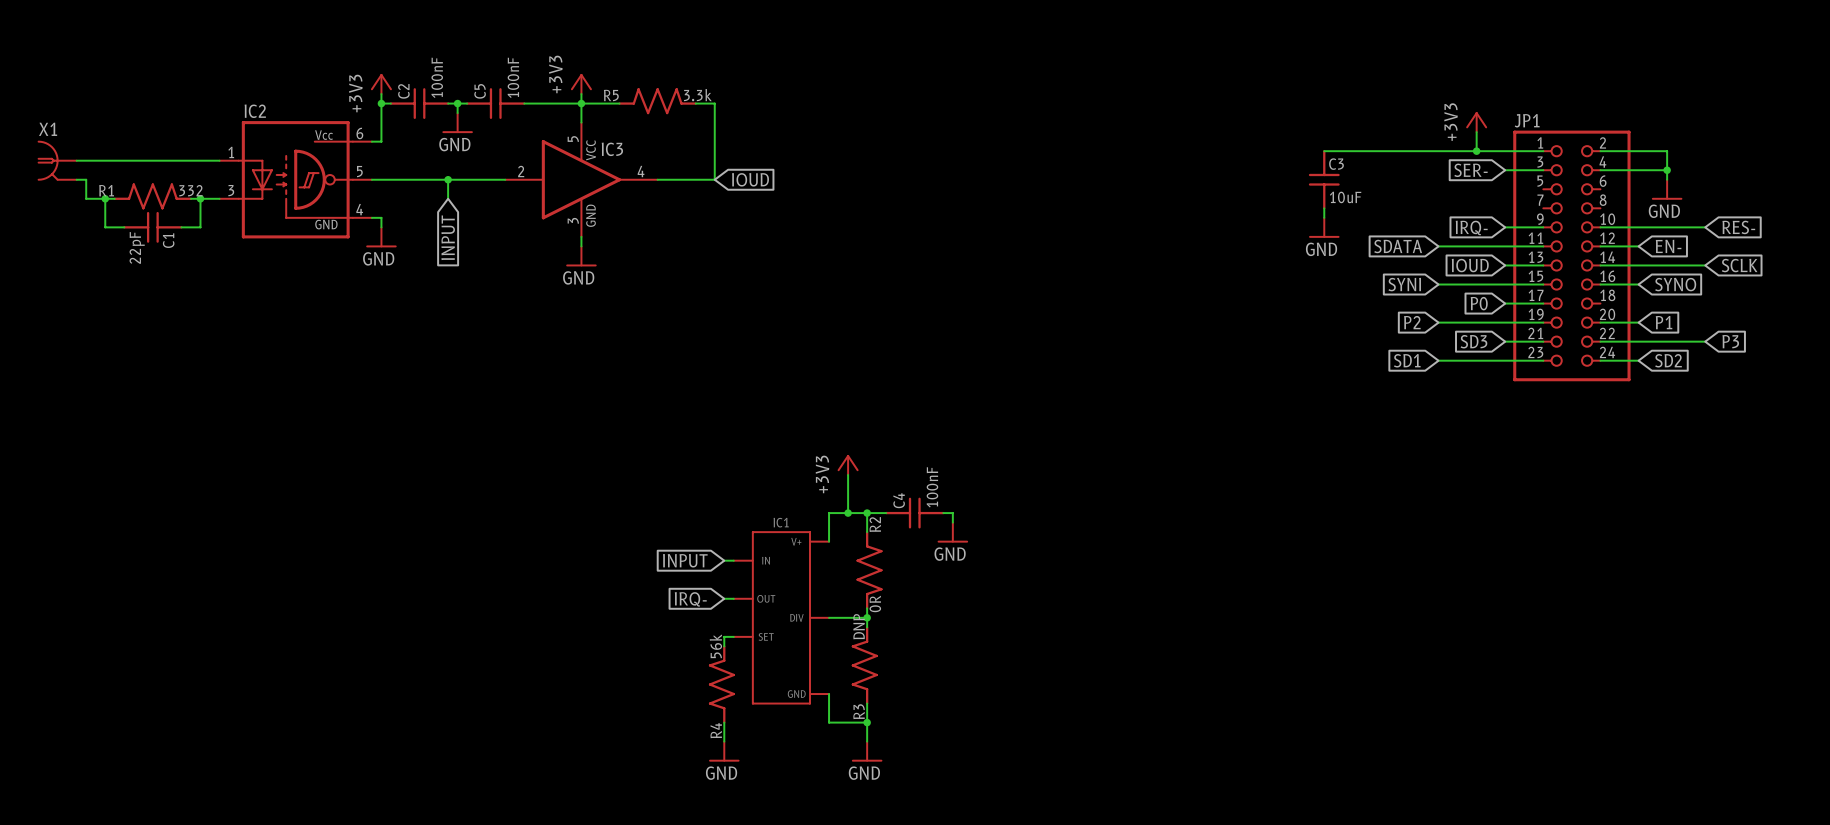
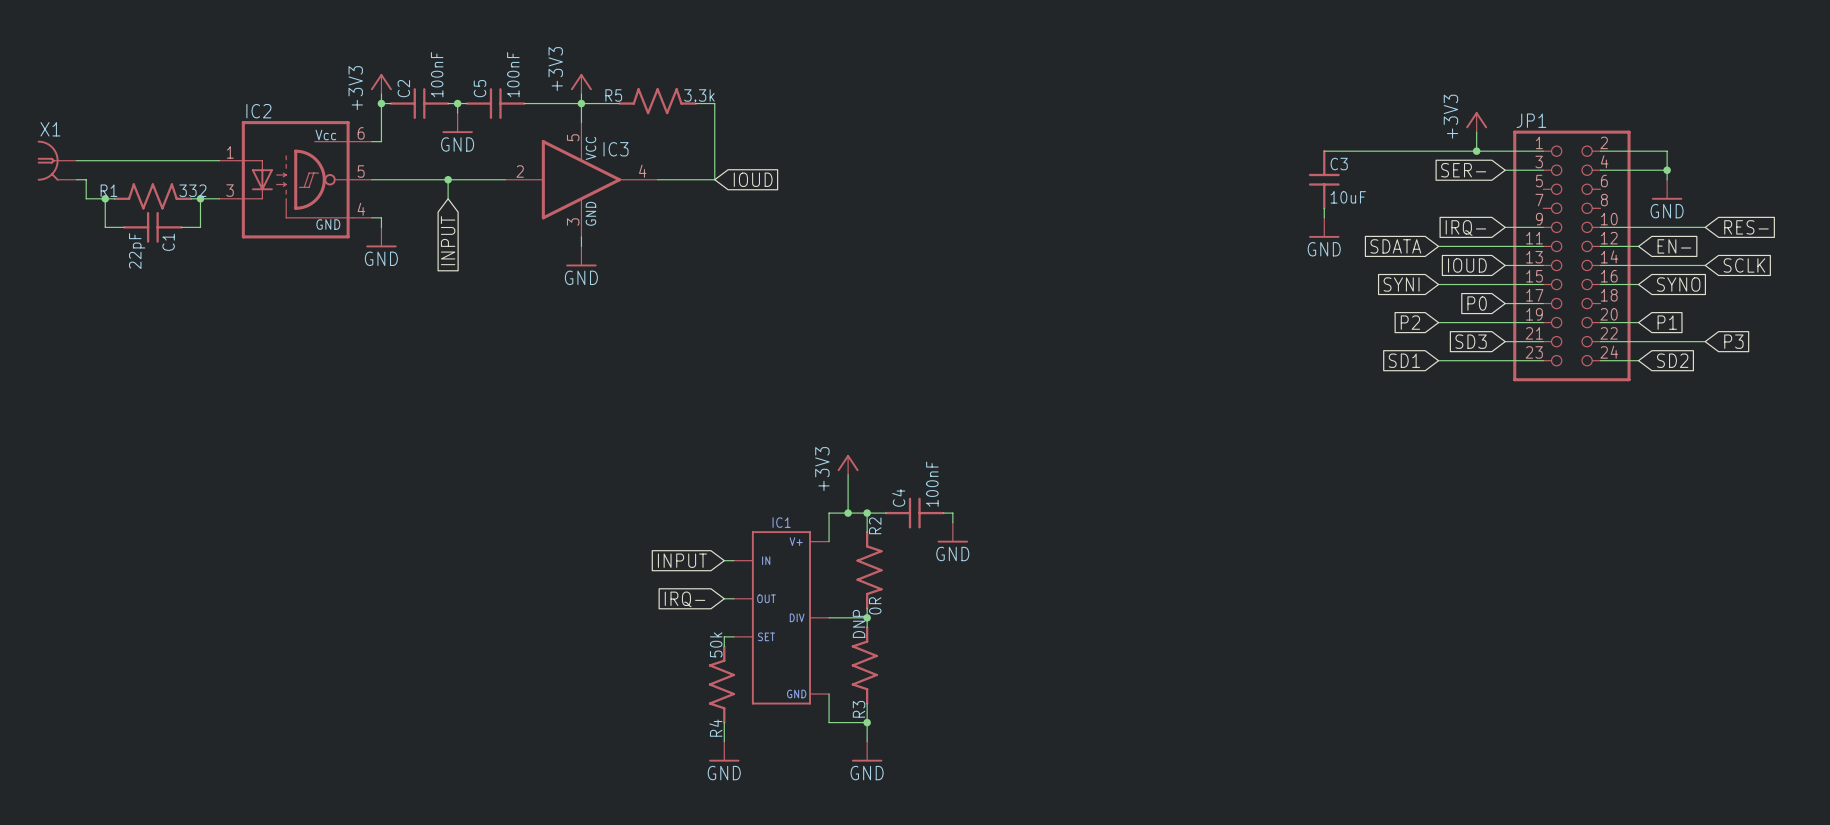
R4 value: 56k (715, 646) -> 50k (716, 644)

